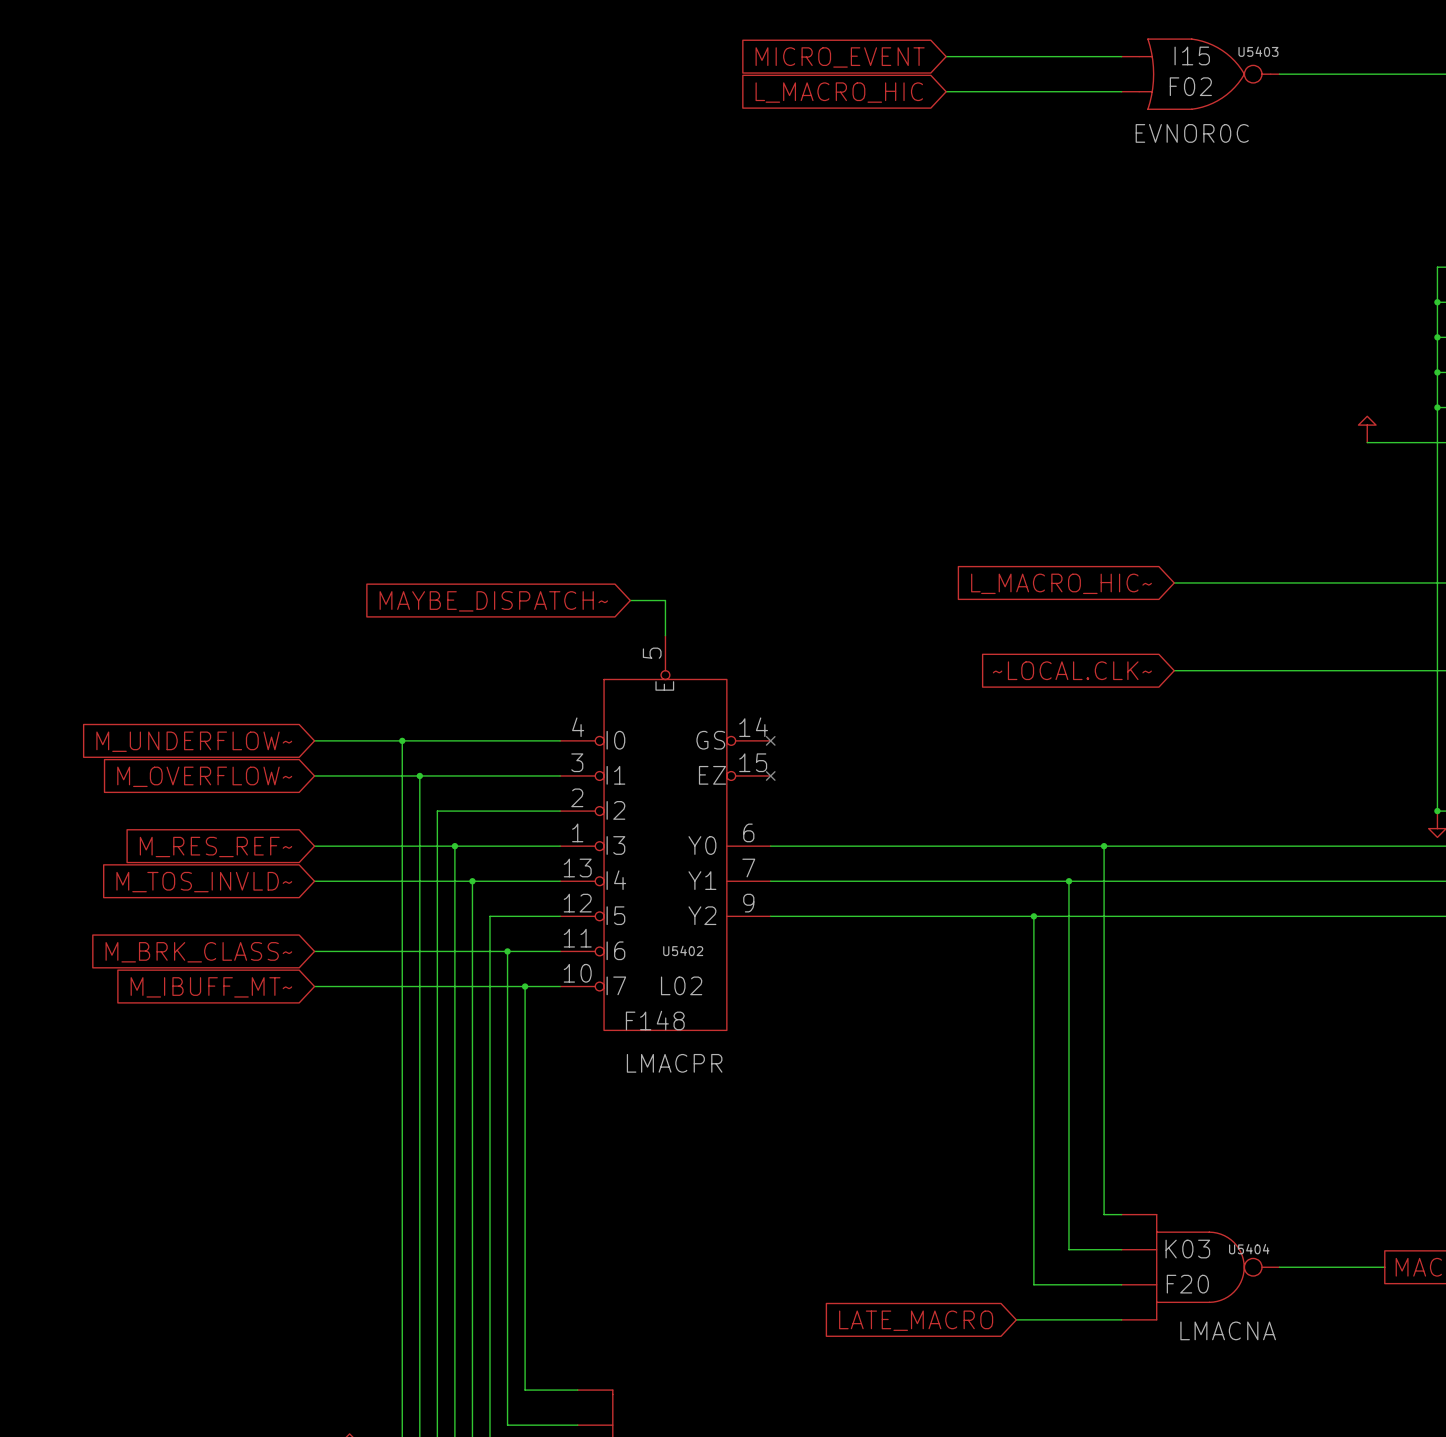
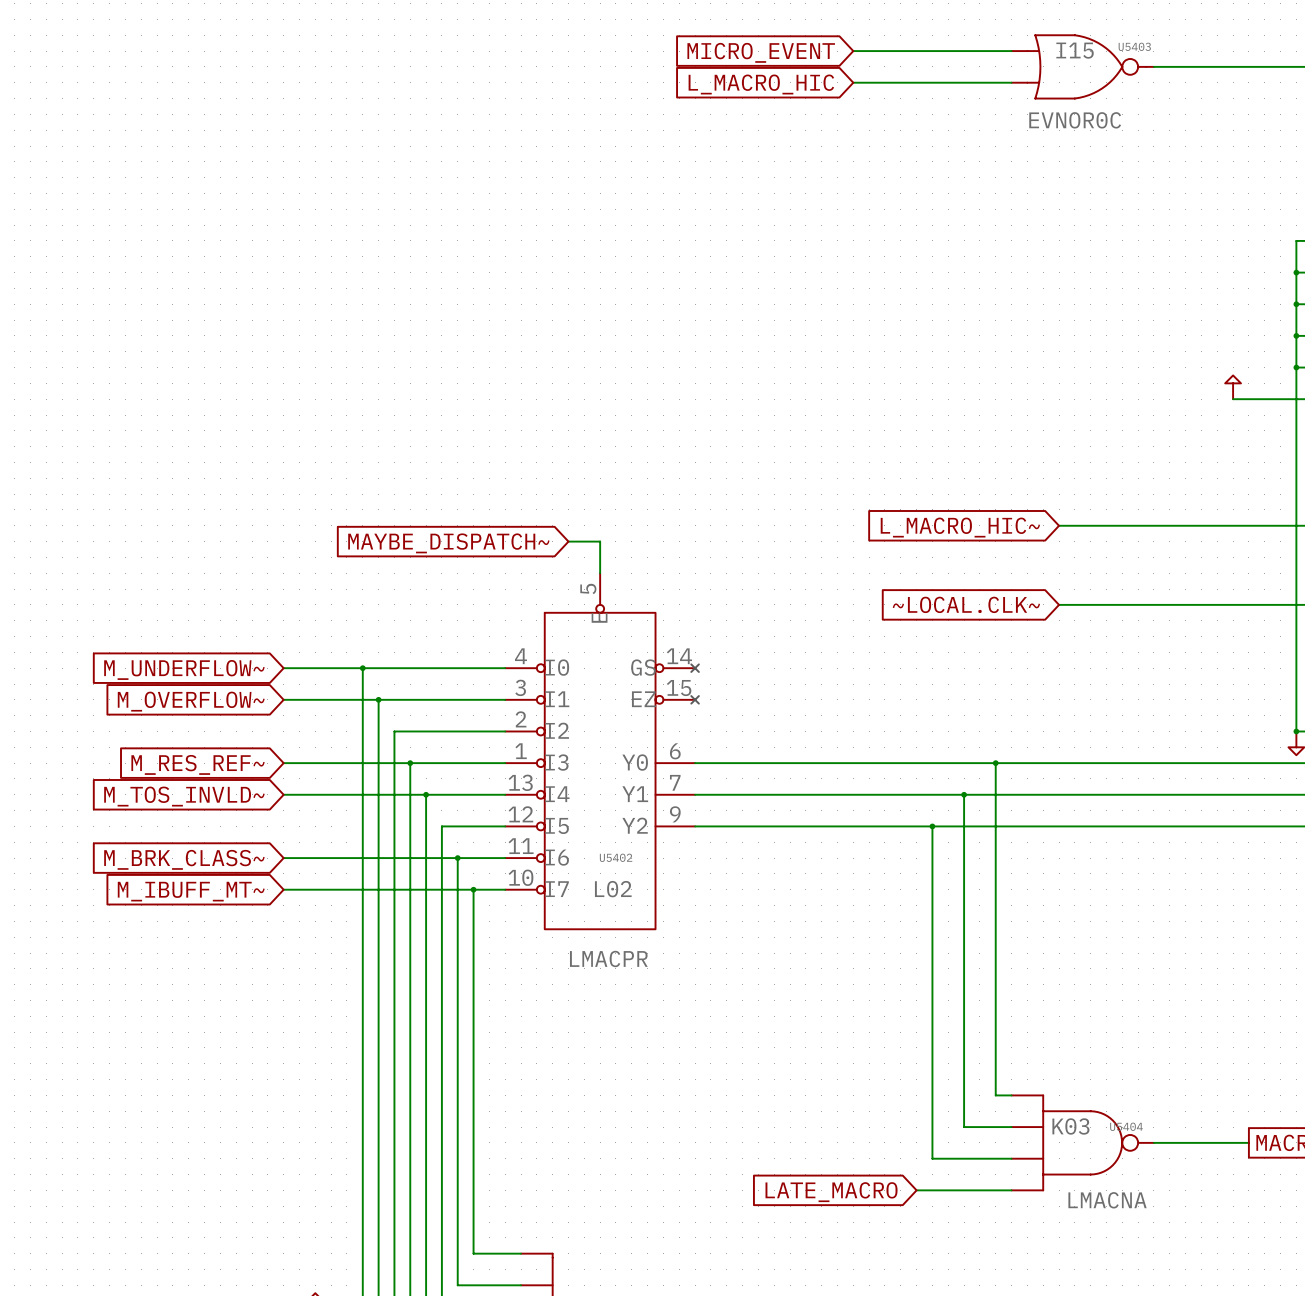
U5403 value: F02 (1190, 86) -> none
U5402 value: F148 (655, 1020) -> none
U5404 value: F20 (1187, 1284) -> none

